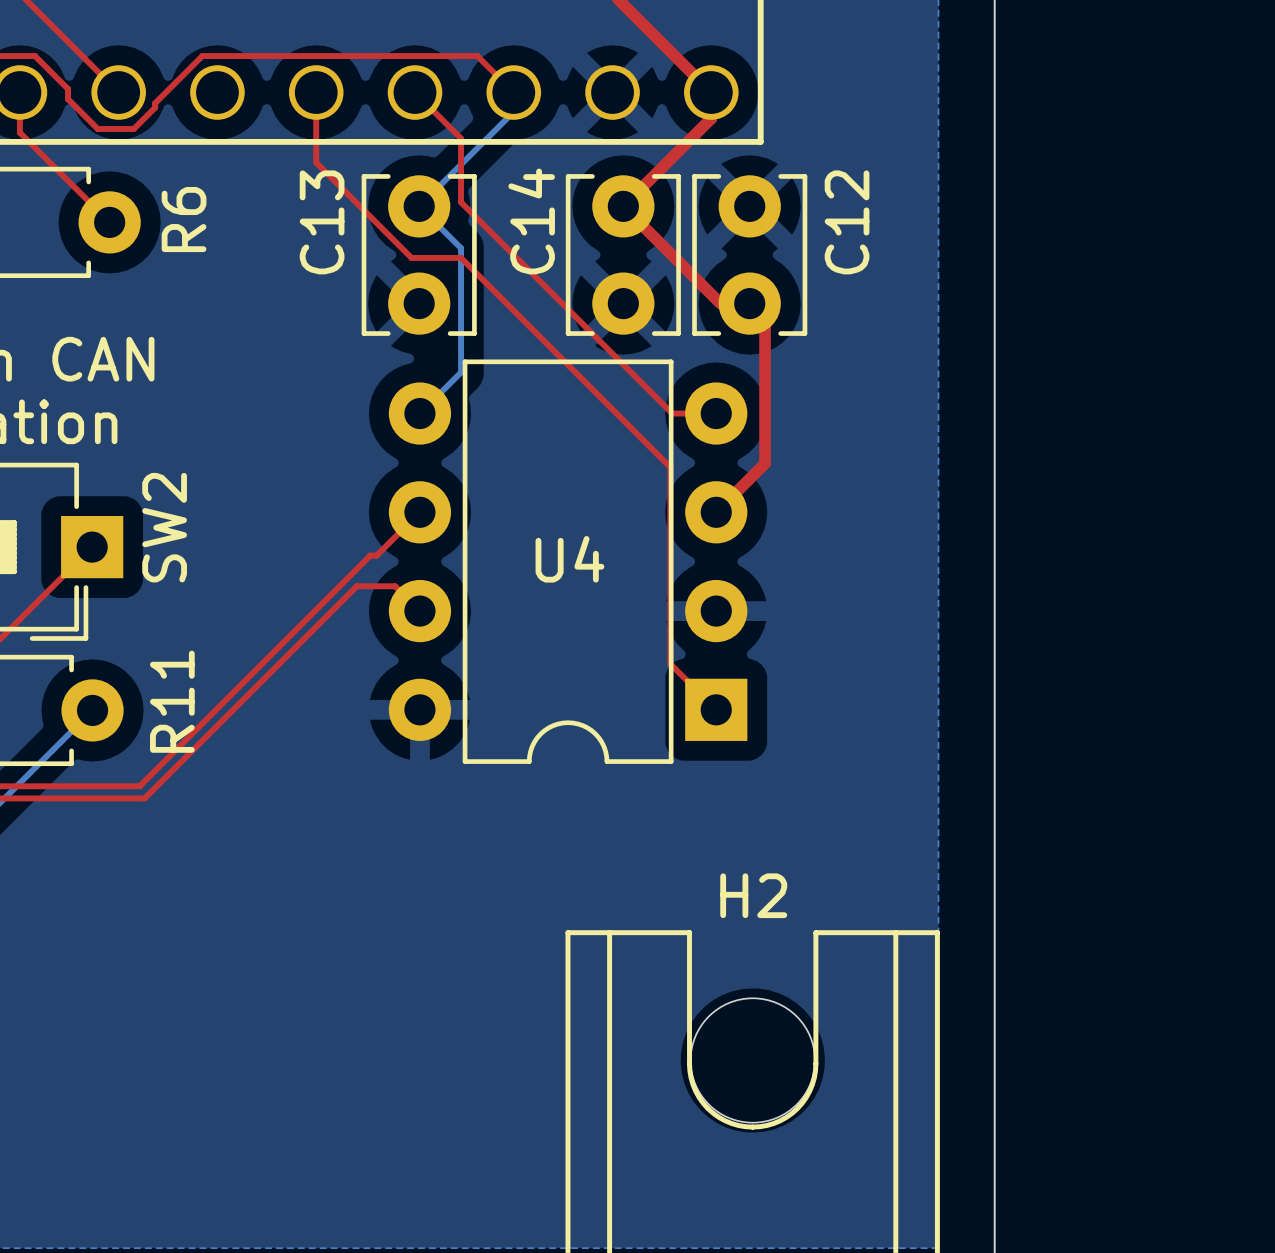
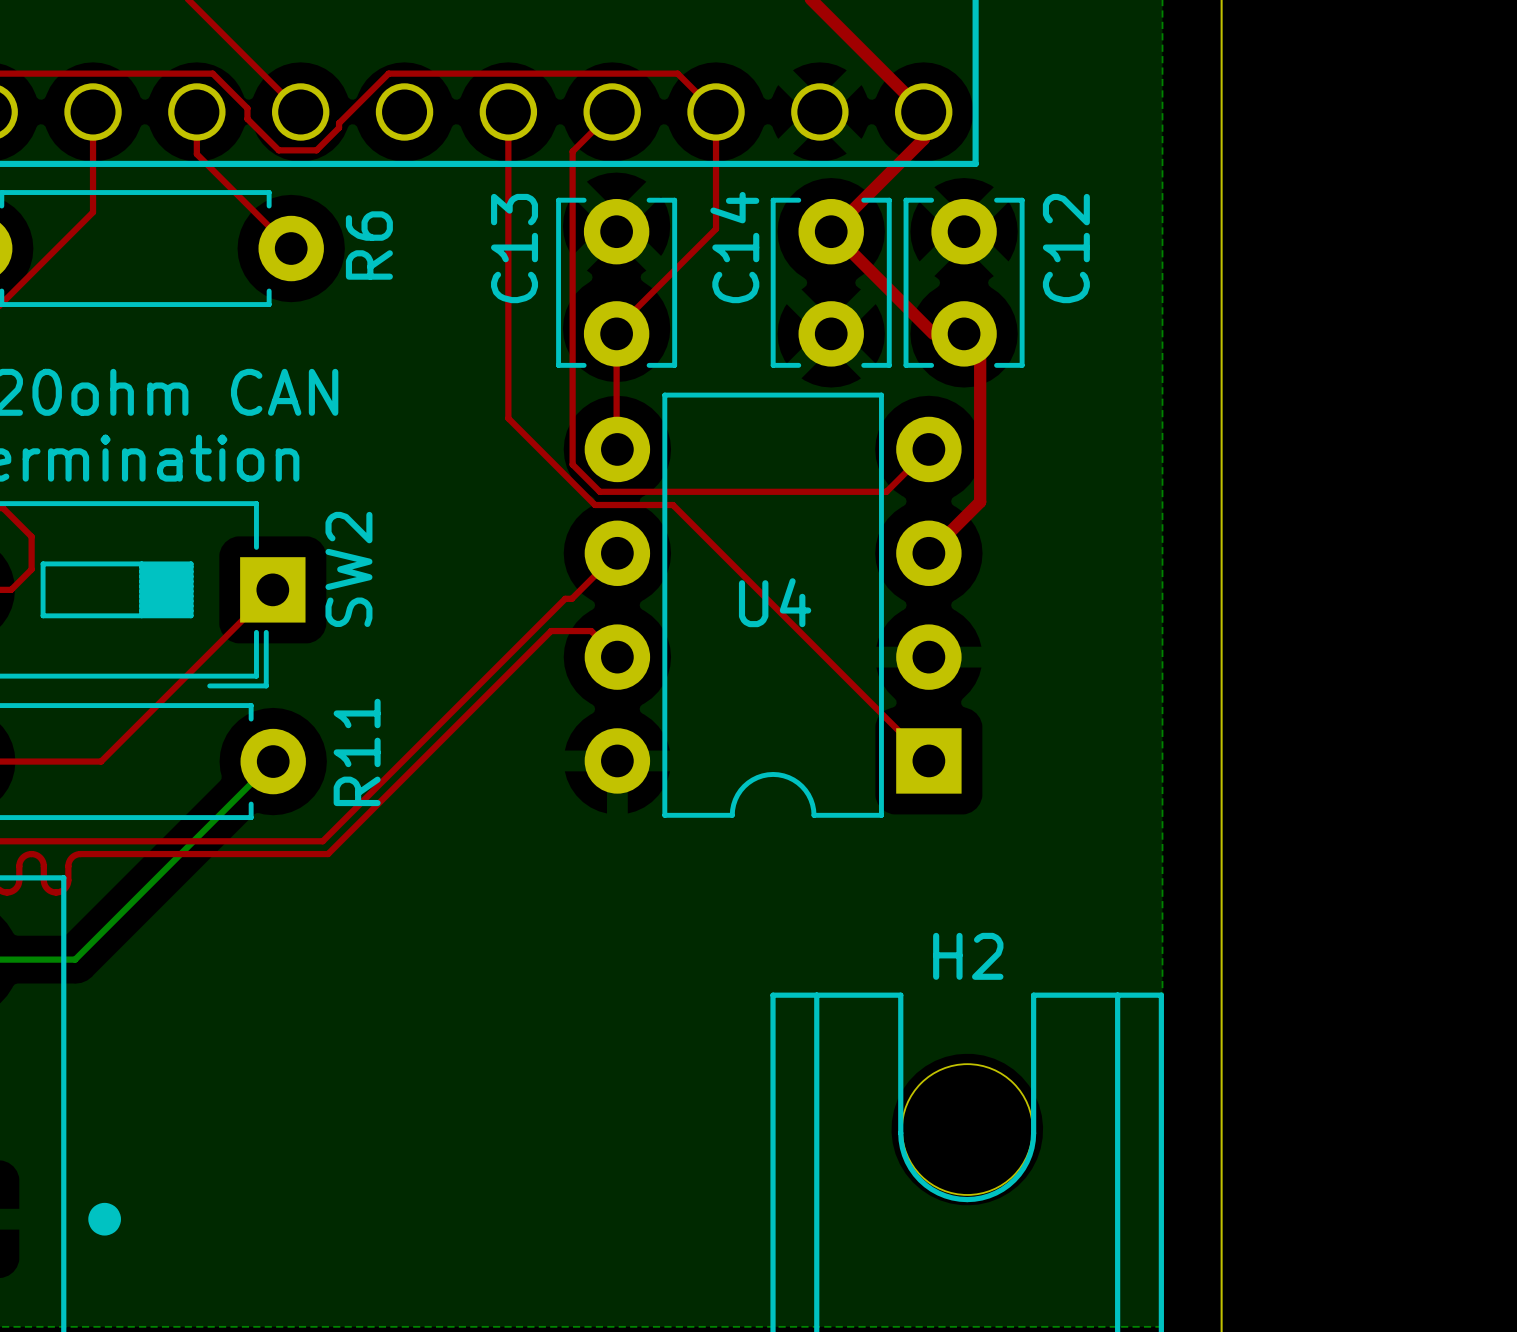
top track: (415, 92) (461, 138) (461, 202) (672, 413) (716, 413) -> (612, 111) (572, 151) (572, 464) (599, 491) (886, 491) (928, 449)
top track: none -> (716, 111) (716, 228) (616, 328) (616, 448)
bottom track: (513, 111) (419, 206) (461, 248) (461, 372) (419, 413) -> none
top track: (316, 162) (411, 257) (461, 257) (670, 467) (670, 663) -> (508, 185) (508, 418) (594, 505) (672, 505) (880, 712)

